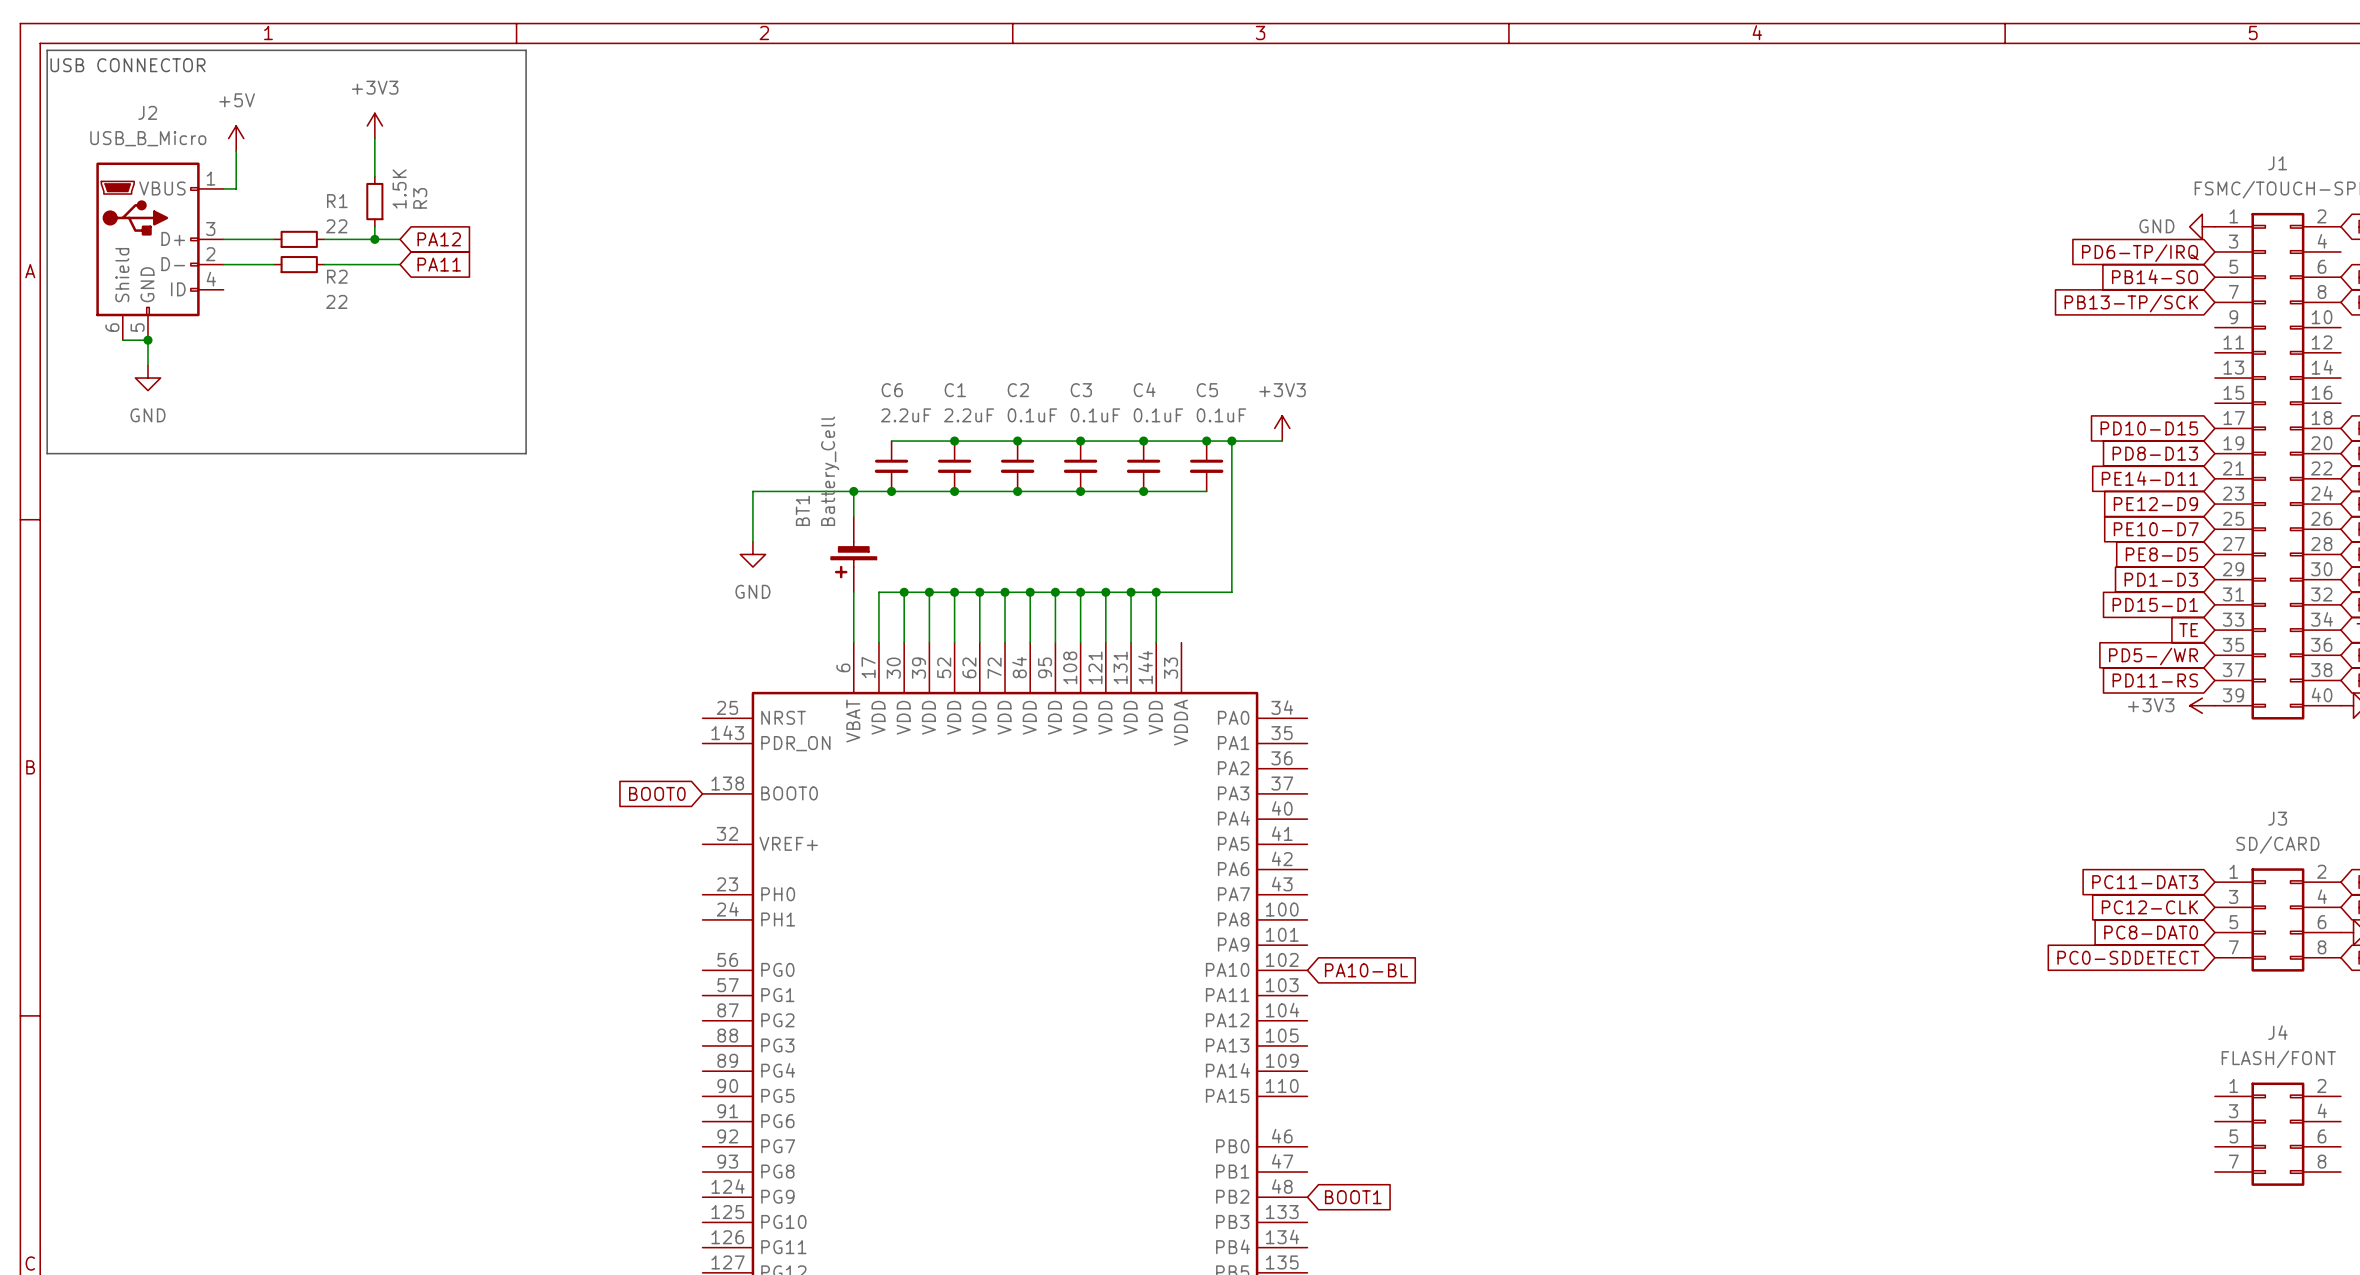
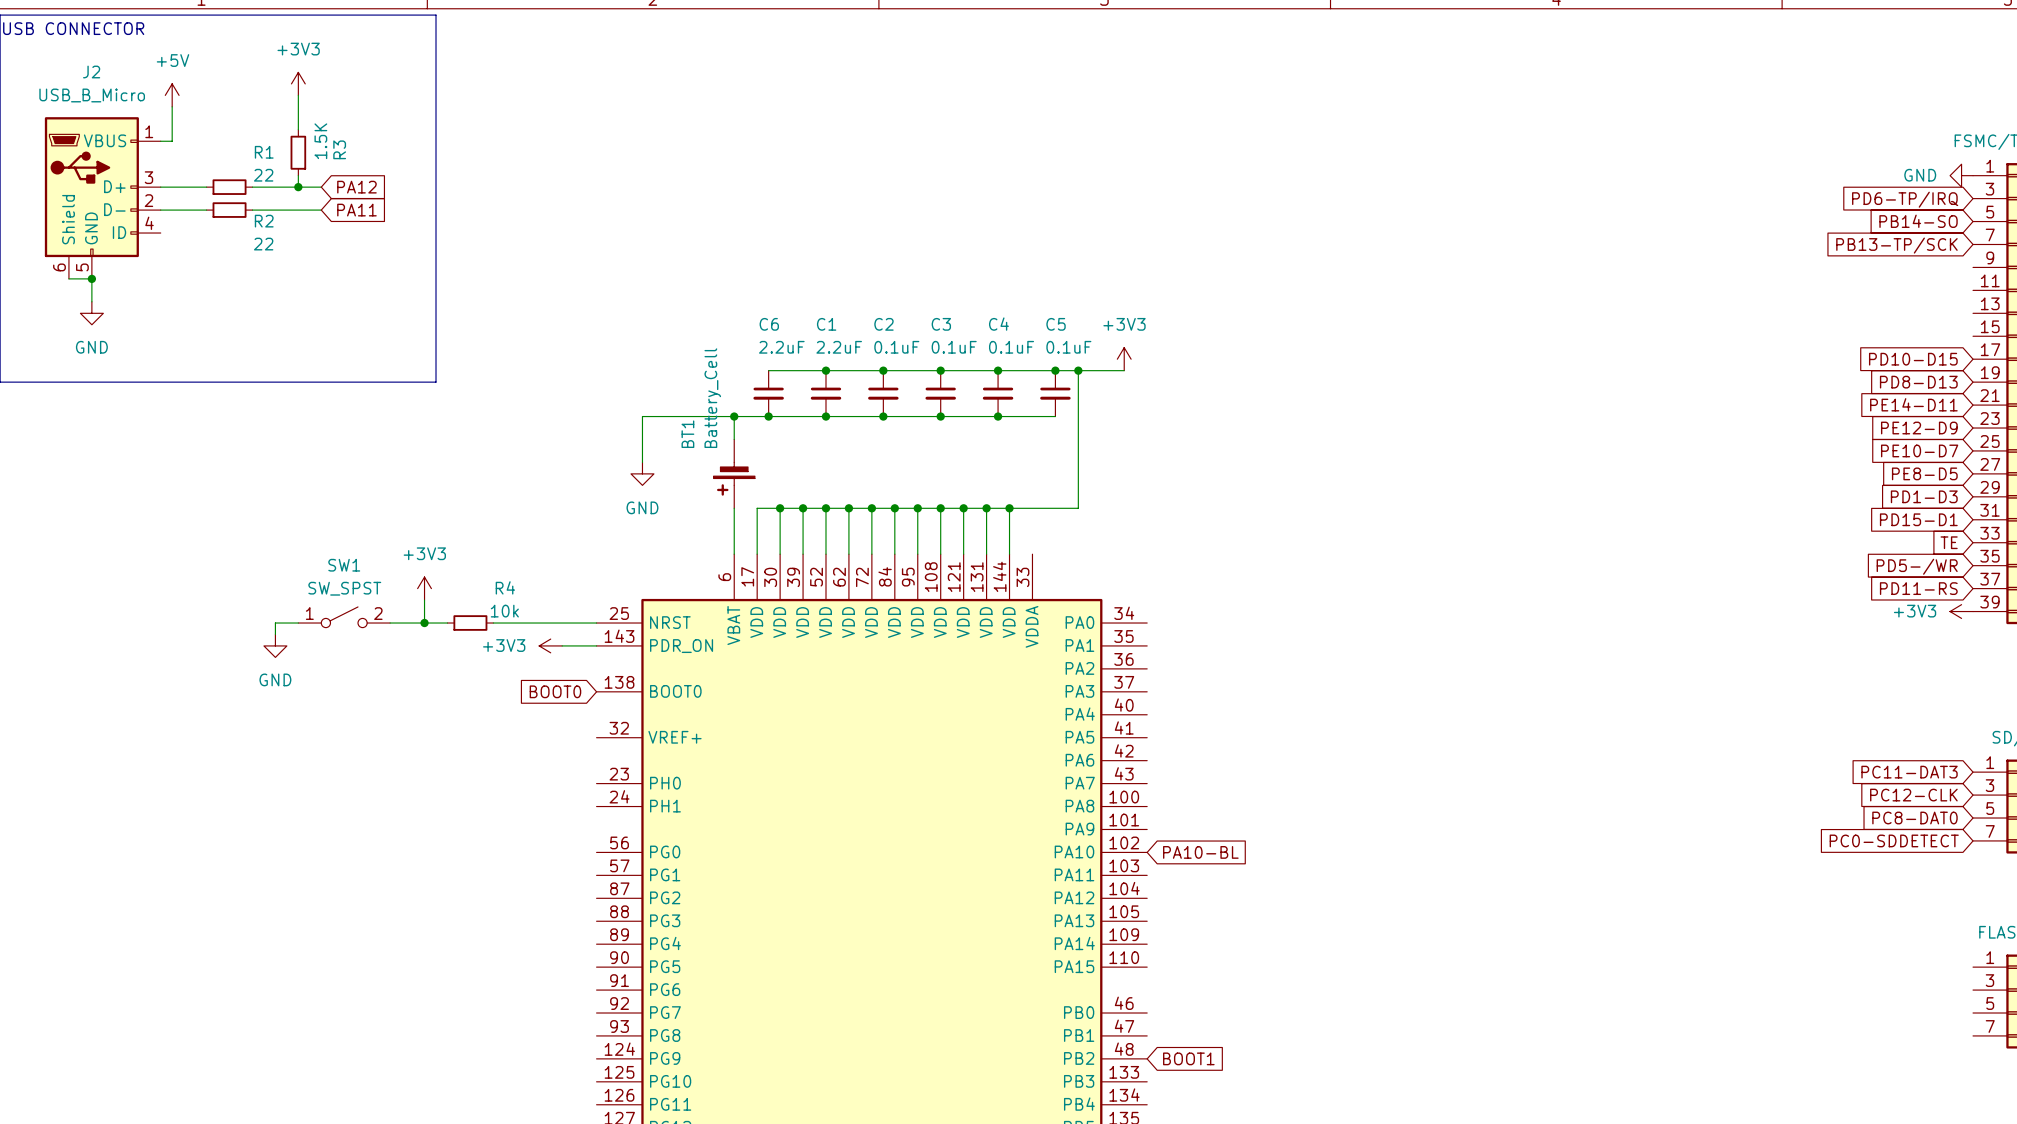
power symbol: none -> +3V3 (424, 588)
wire: none -> (424, 600) (424, 623)
SW1: none -> SW_SPST (344, 617)
wire: none -> (298, 623) (275, 623) (275, 634)
wire: none -> (390, 623) (447, 623)
junction: none -> (424, 623)
R4: none -> 10k (470, 623)
wire: none -> (493, 623) (596, 623)
power symbol: none -> GND (275, 645)
power symbol: none -> +3V3 (550, 645)
wire: none -> (562, 645) (596, 645)

